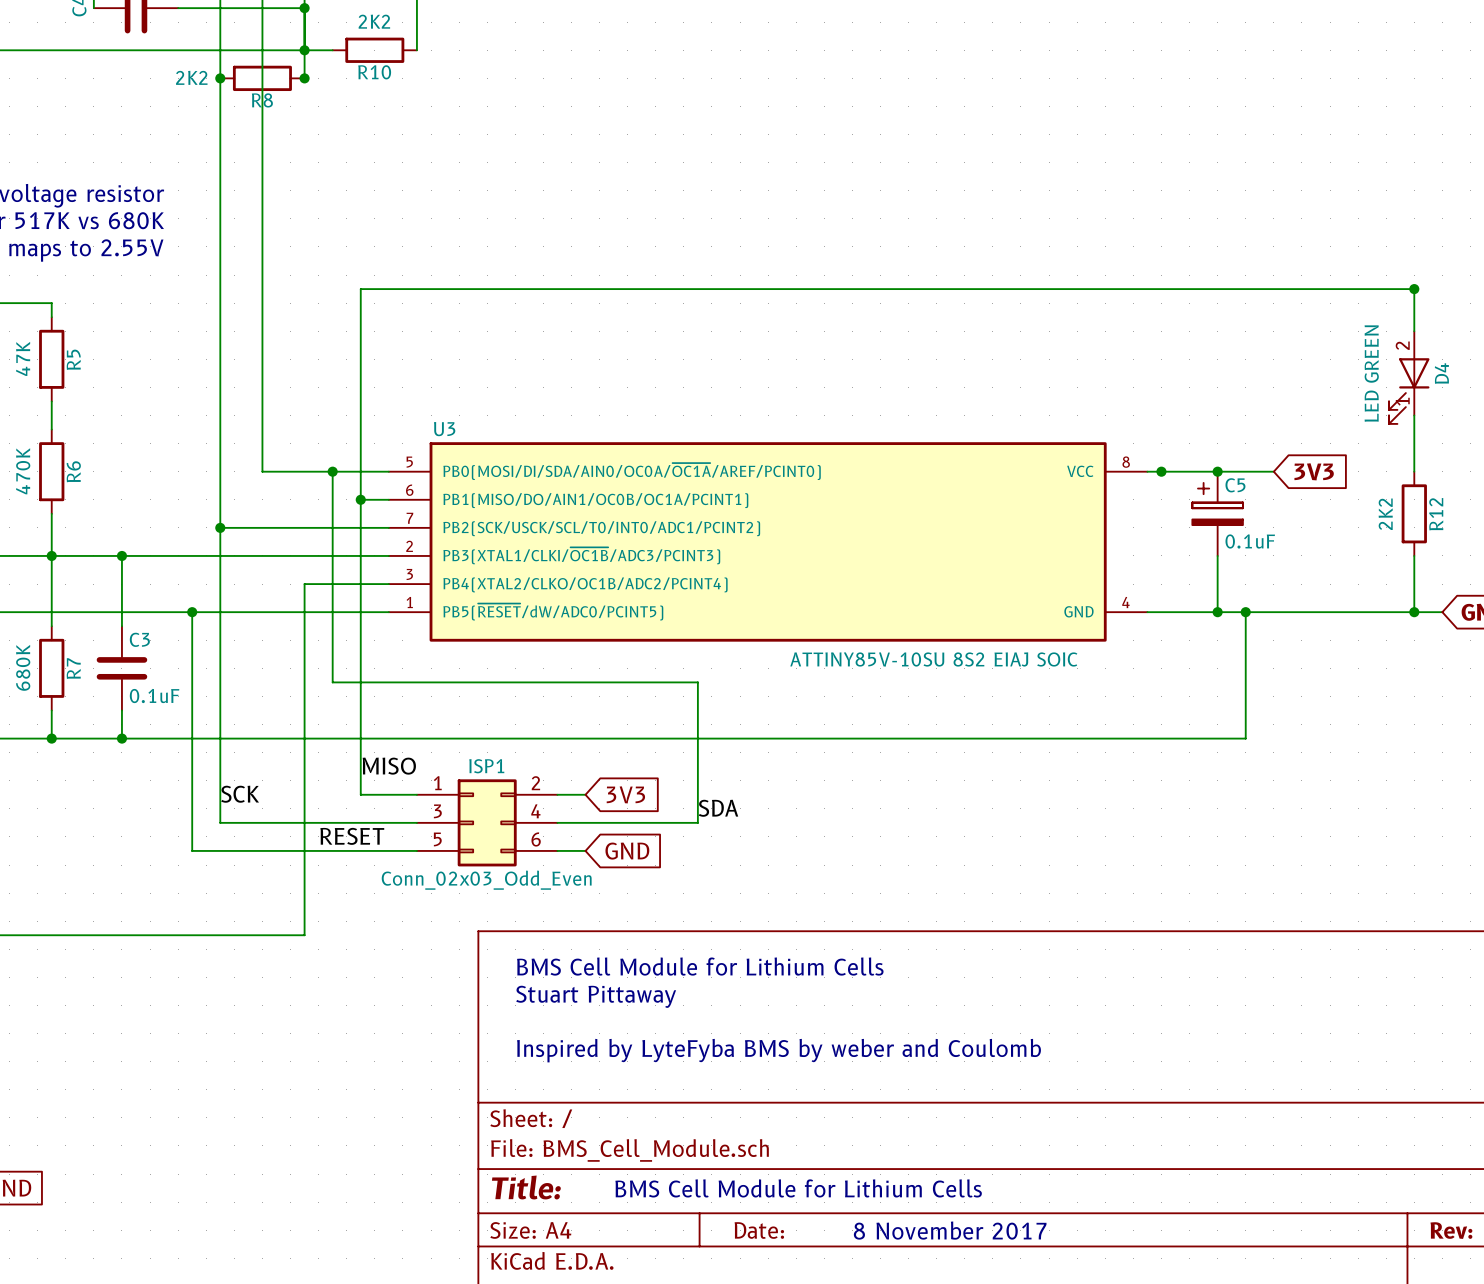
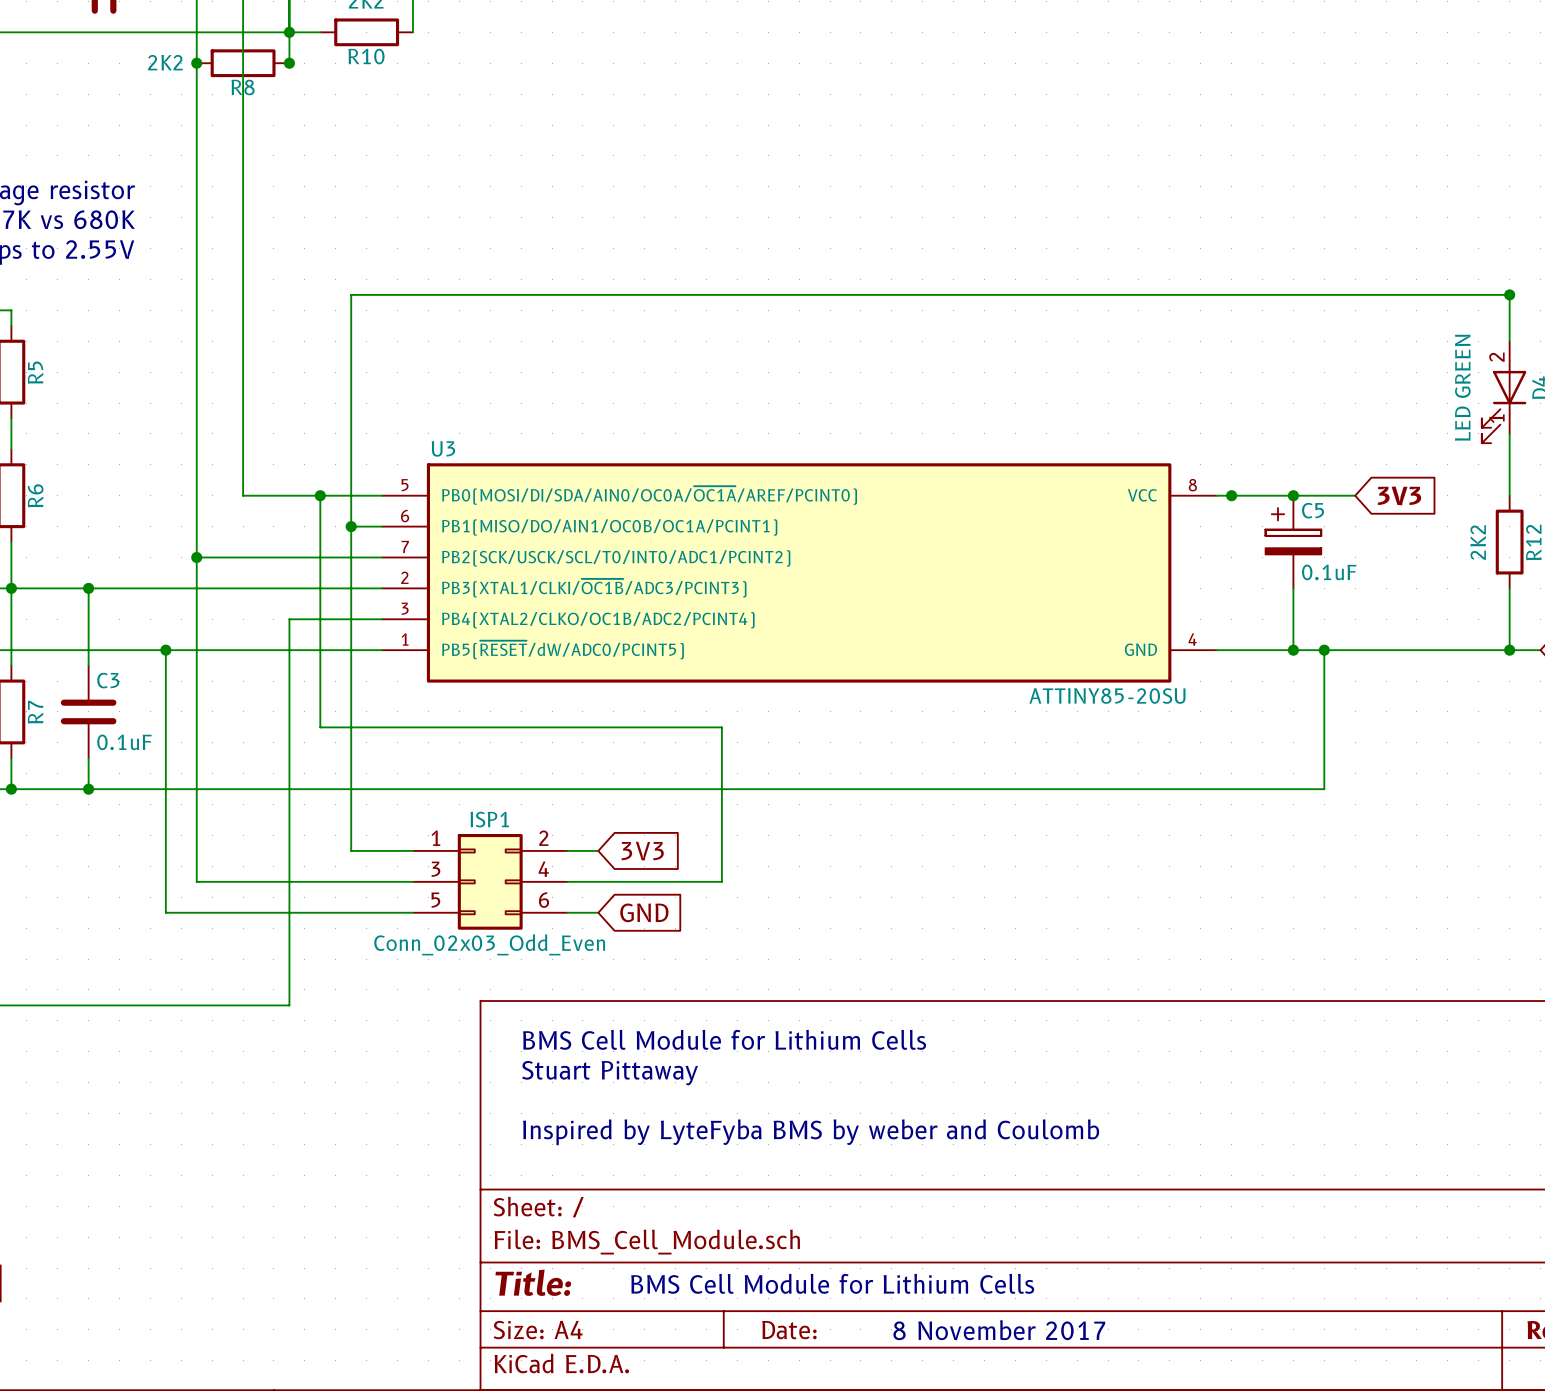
U3 value: ATTINY85V-10SU 8S2 EIAJ SOIC (933, 659) -> ATTINY85-20SU (1107, 696)
label: MISO (389, 766) -> none
label: SCK (240, 794) -> none
label: SDA (718, 808) -> none
label: RESET (352, 836) -> none

